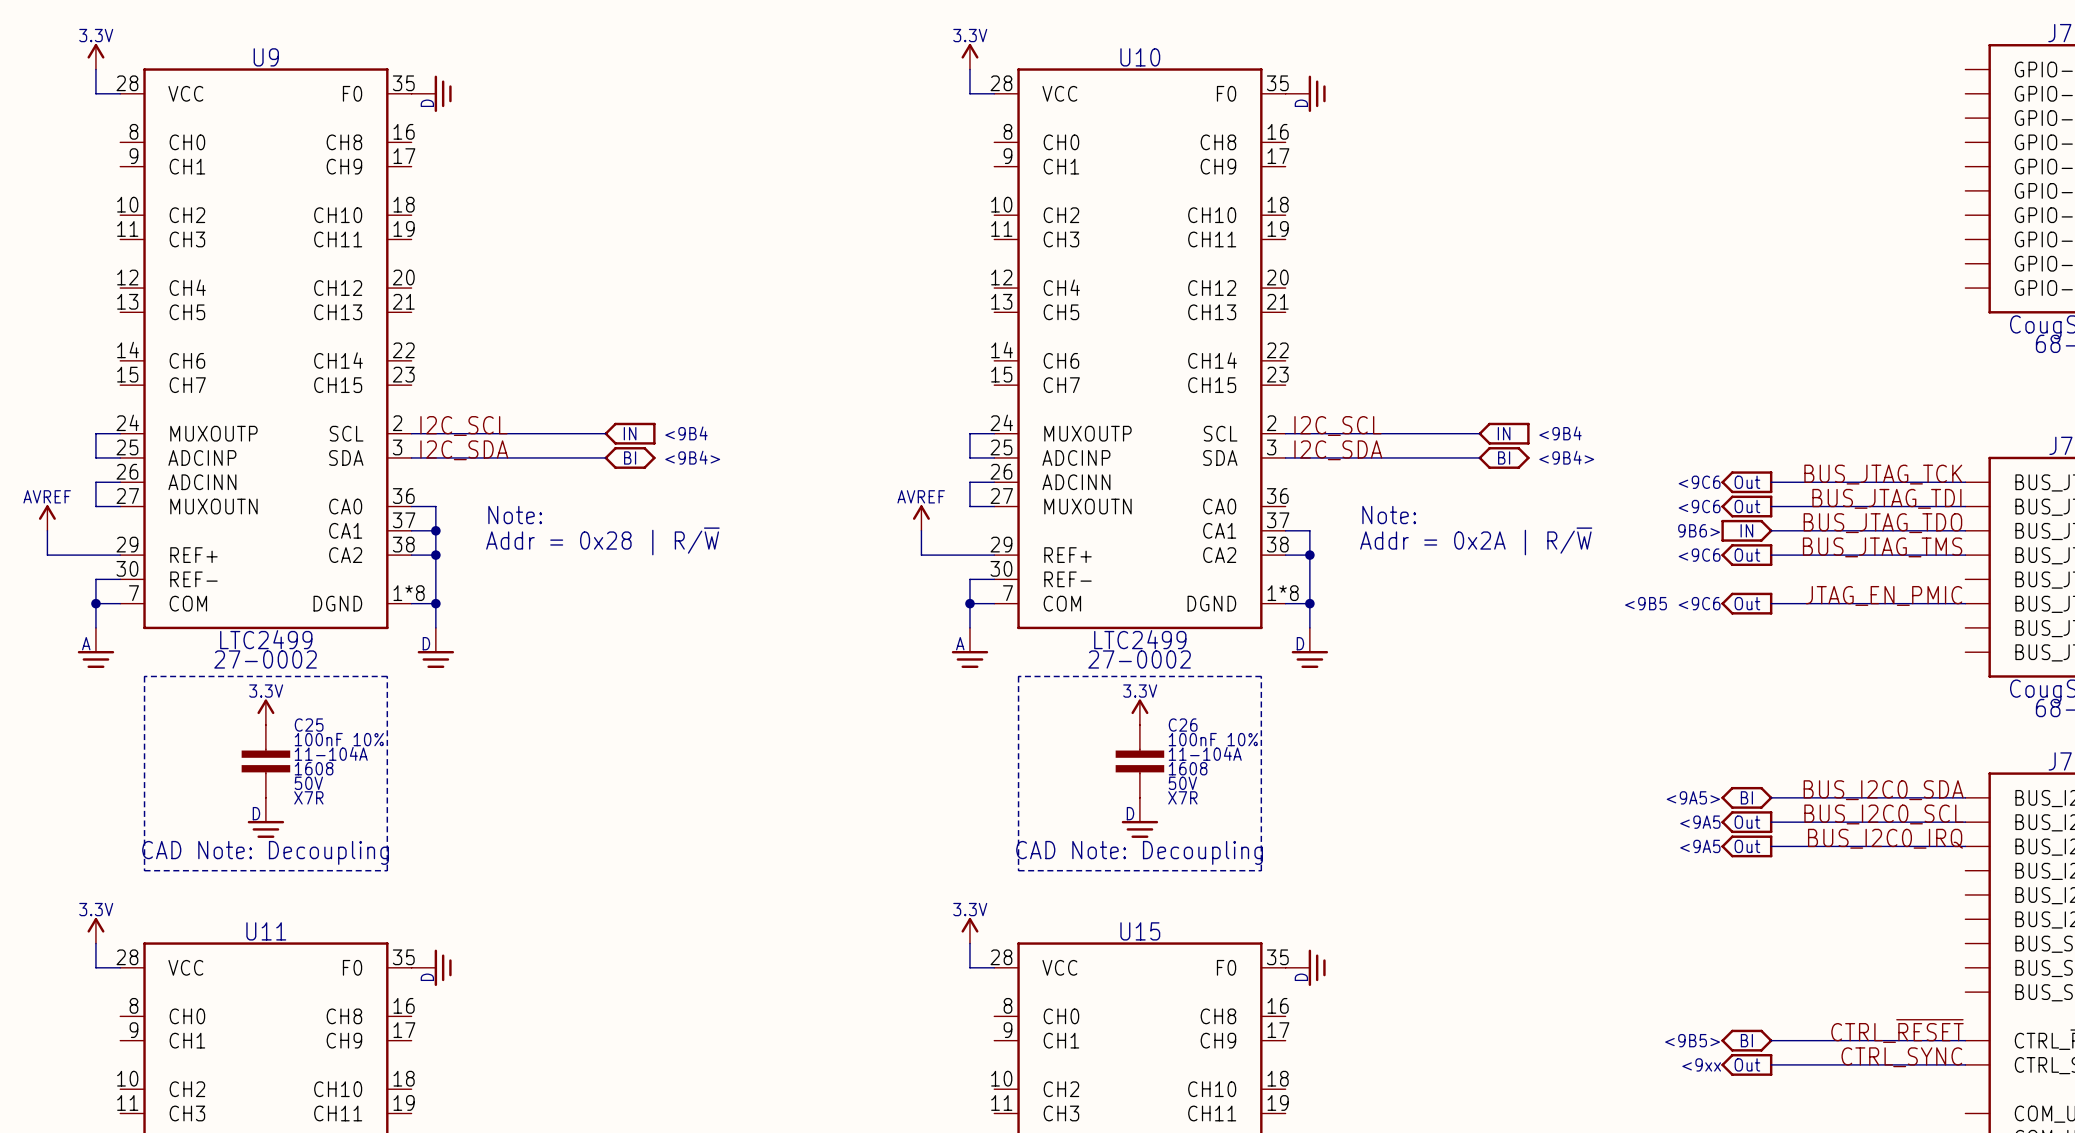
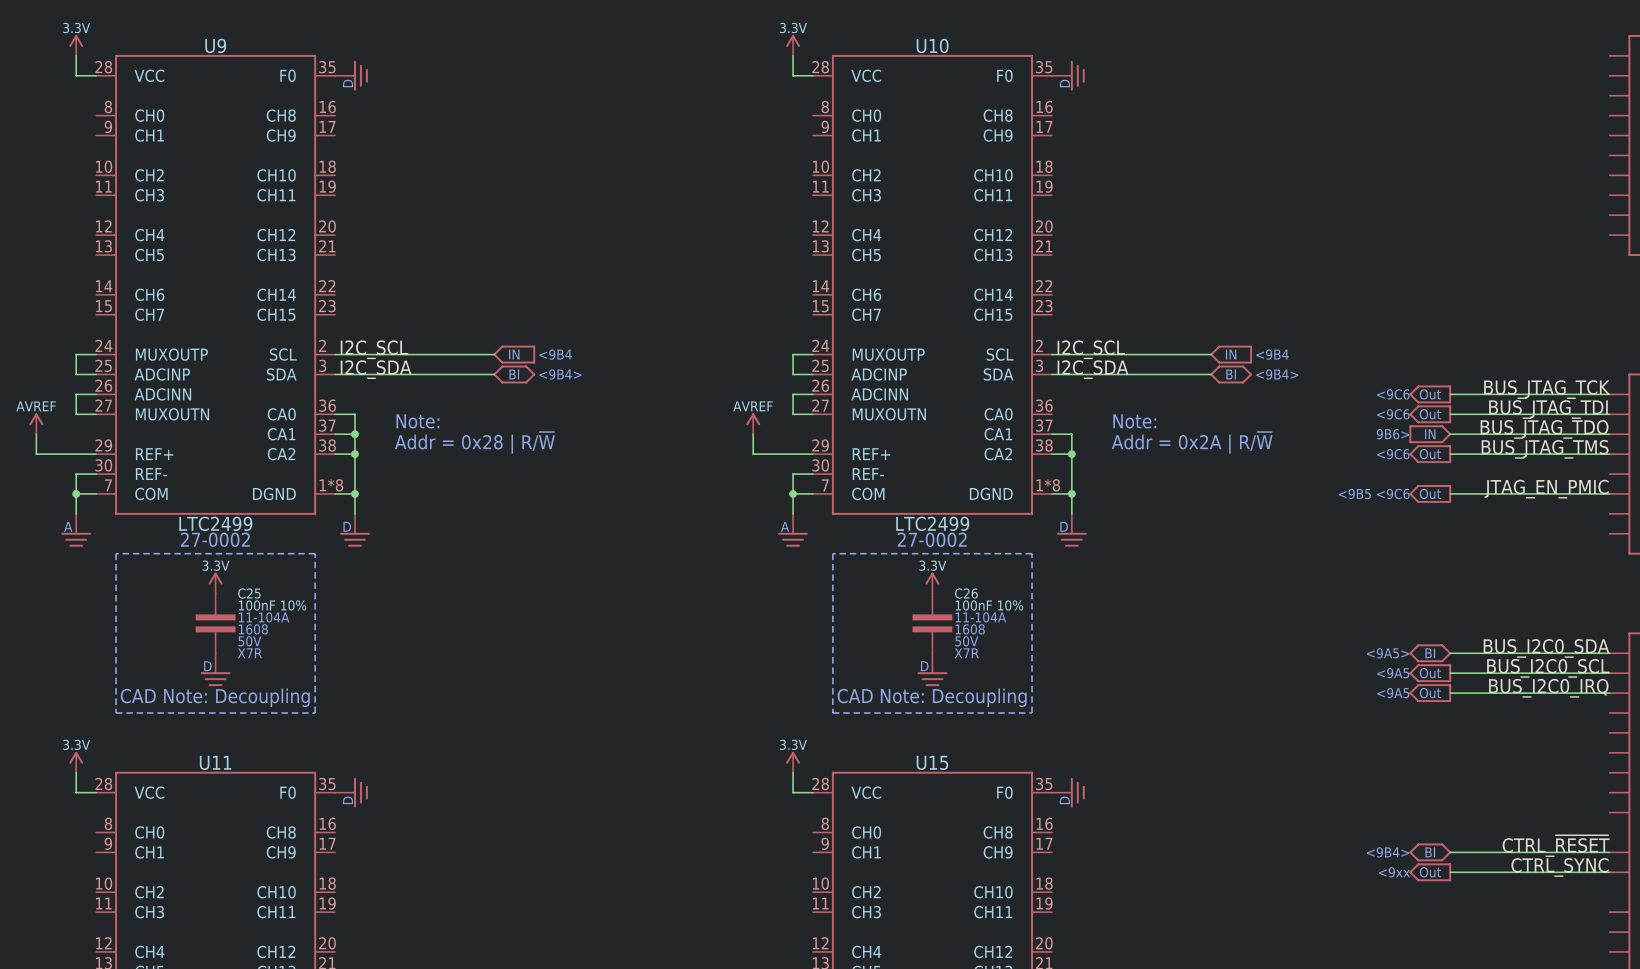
text: <9B5> (1692, 1040) -> <9B4> (1388, 852)

